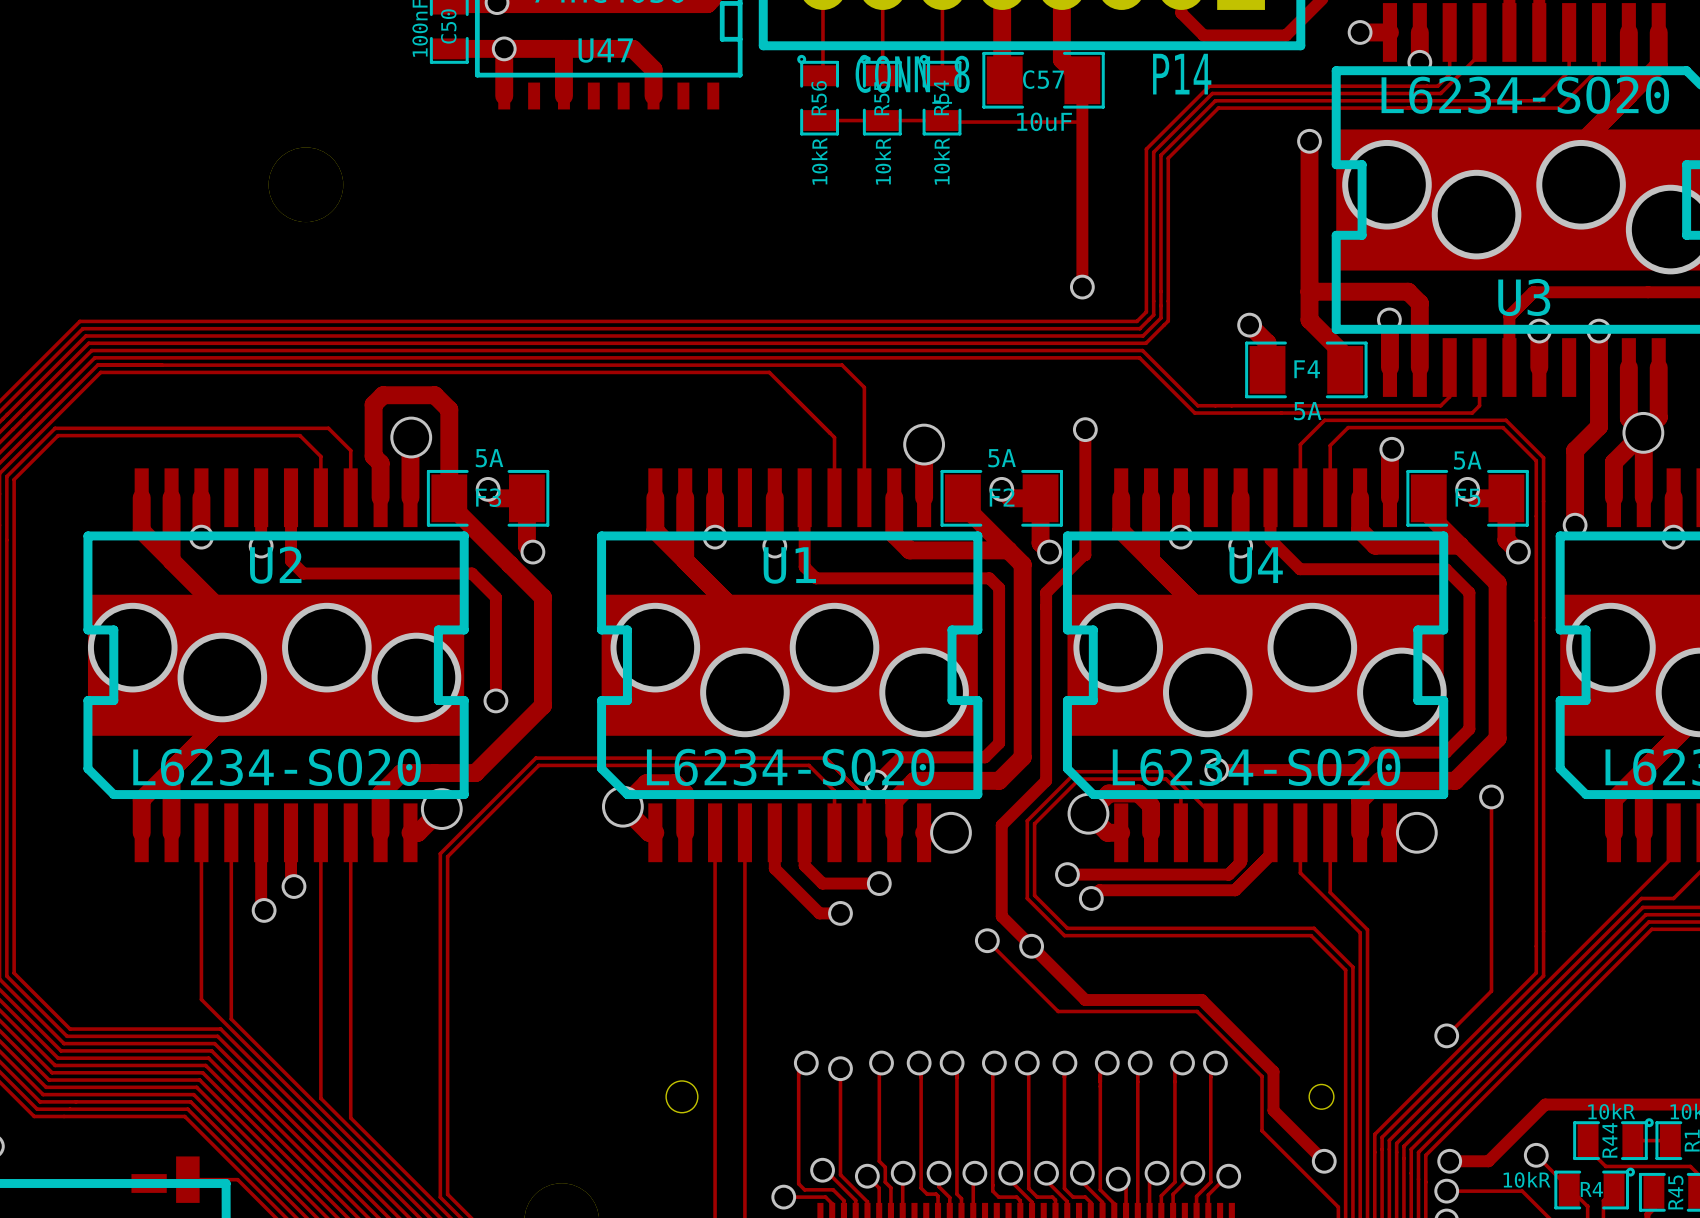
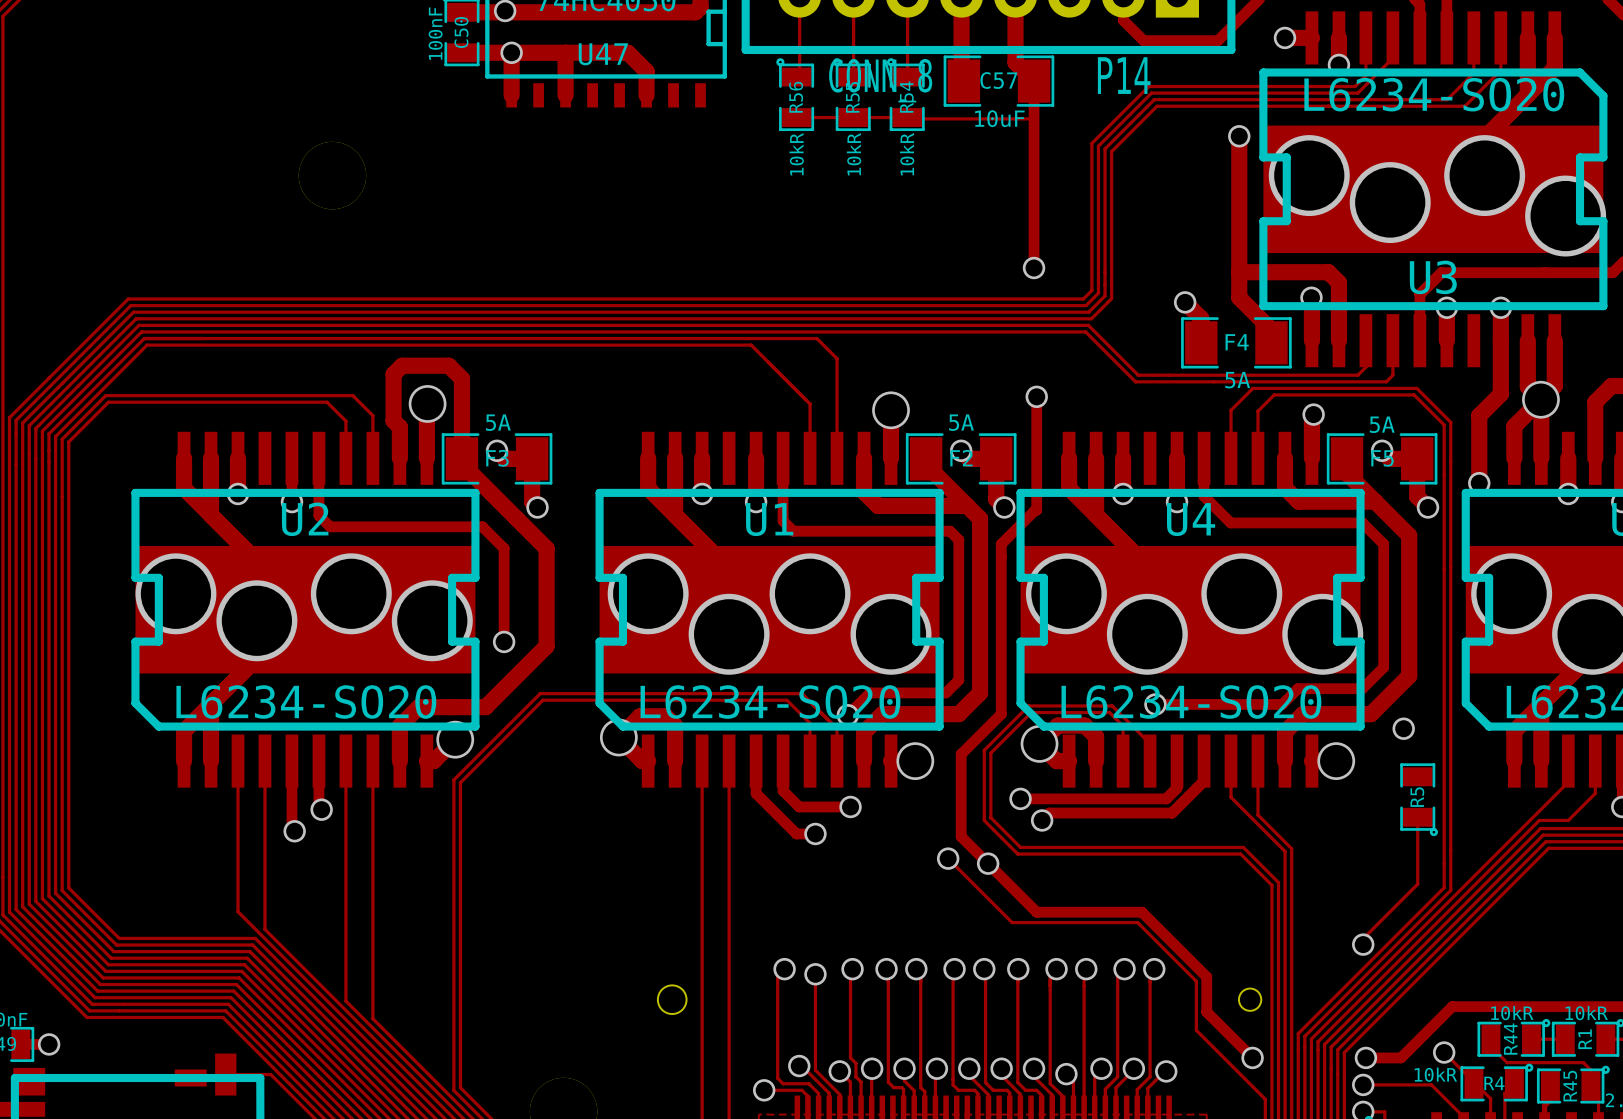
track: (1491, 796) (1491, 991) (1446, 1035) -> none
R5: none -> (1419, 799)
track: none -> (1417, 817) (1417, 884) (1366, 935)

